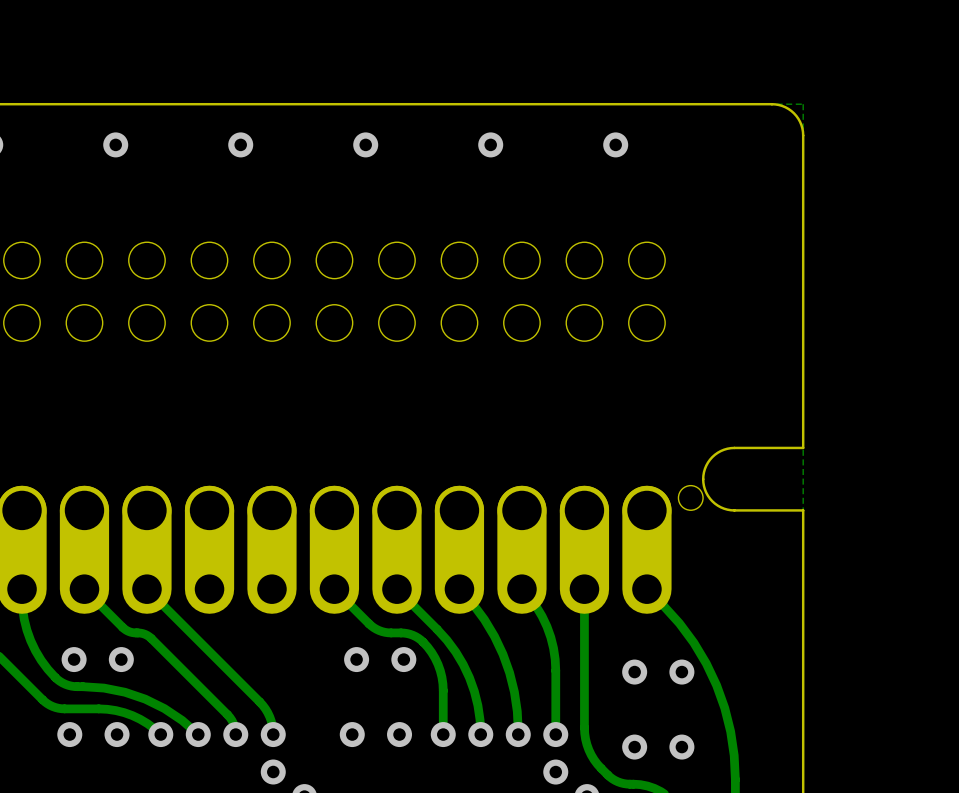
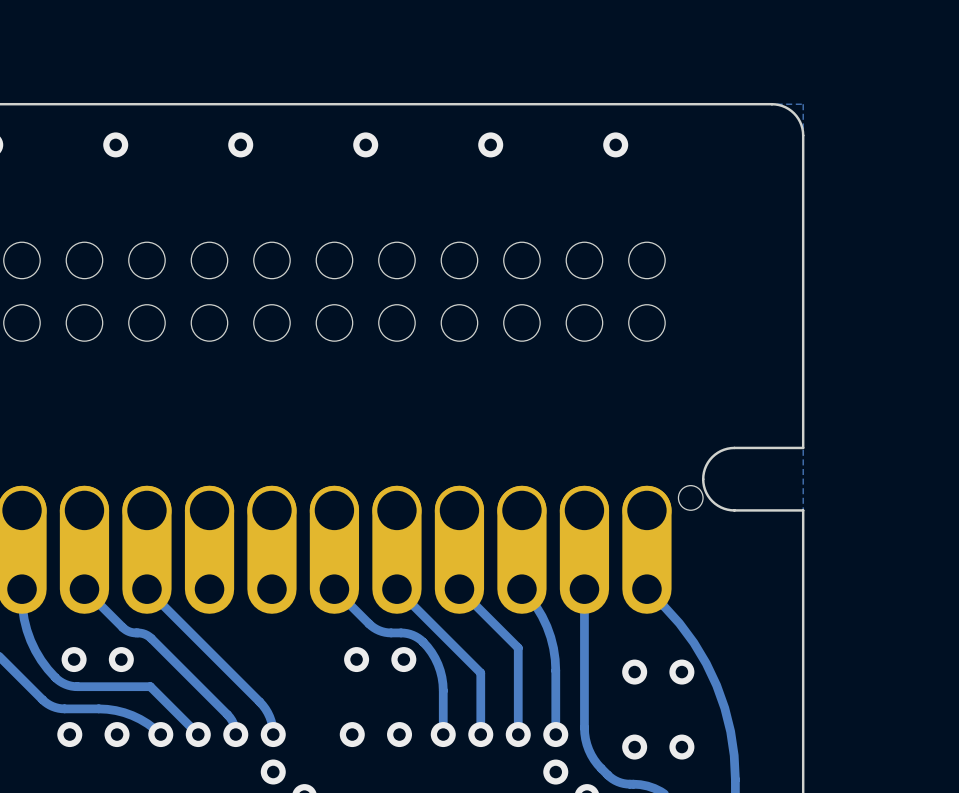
track: (459, 589) (484, 619) (502, 654) (514, 691) (518, 731) -> (459, 589) (518, 647) (518, 731)
track: (437, 629) (455, 651) (469, 677) (477, 705) (480, 734) -> (437, 629) (480, 672) (480, 734)
track: (82, 686) (104, 688) (145, 699) (164, 708) (198, 734) -> (82, 686) (150, 686) (198, 734)

